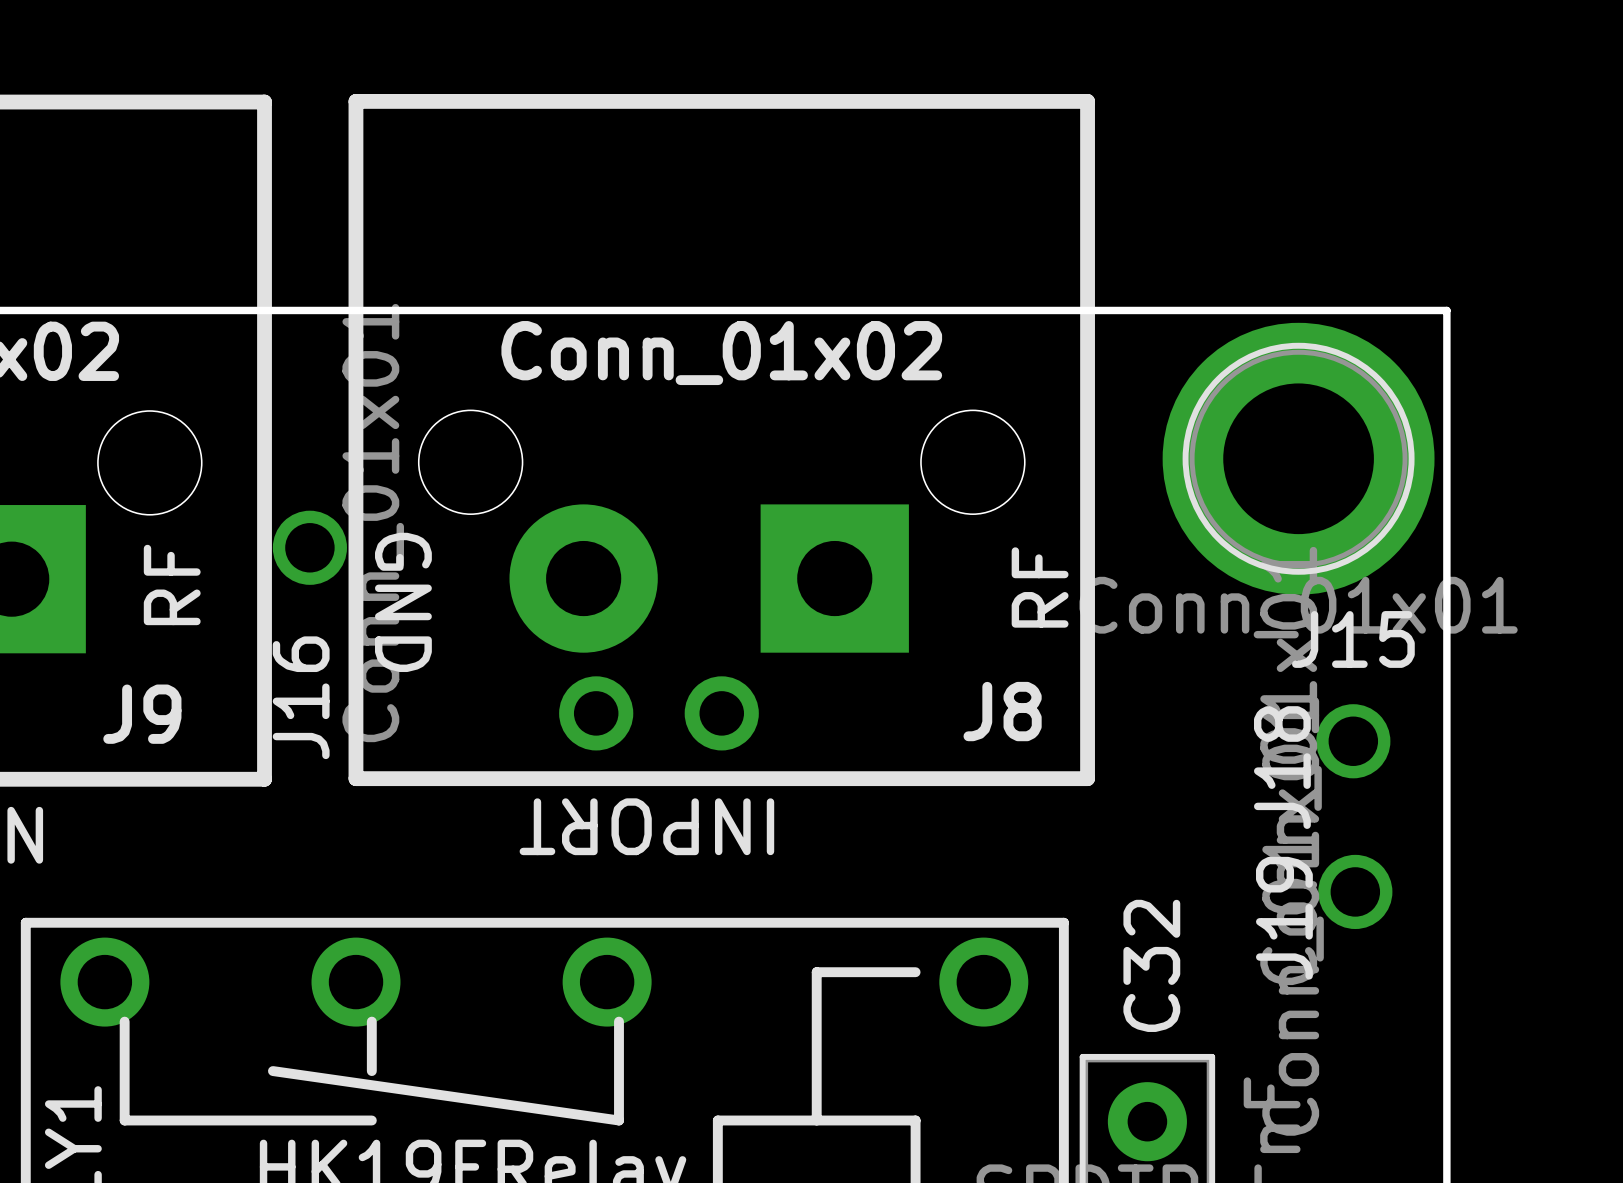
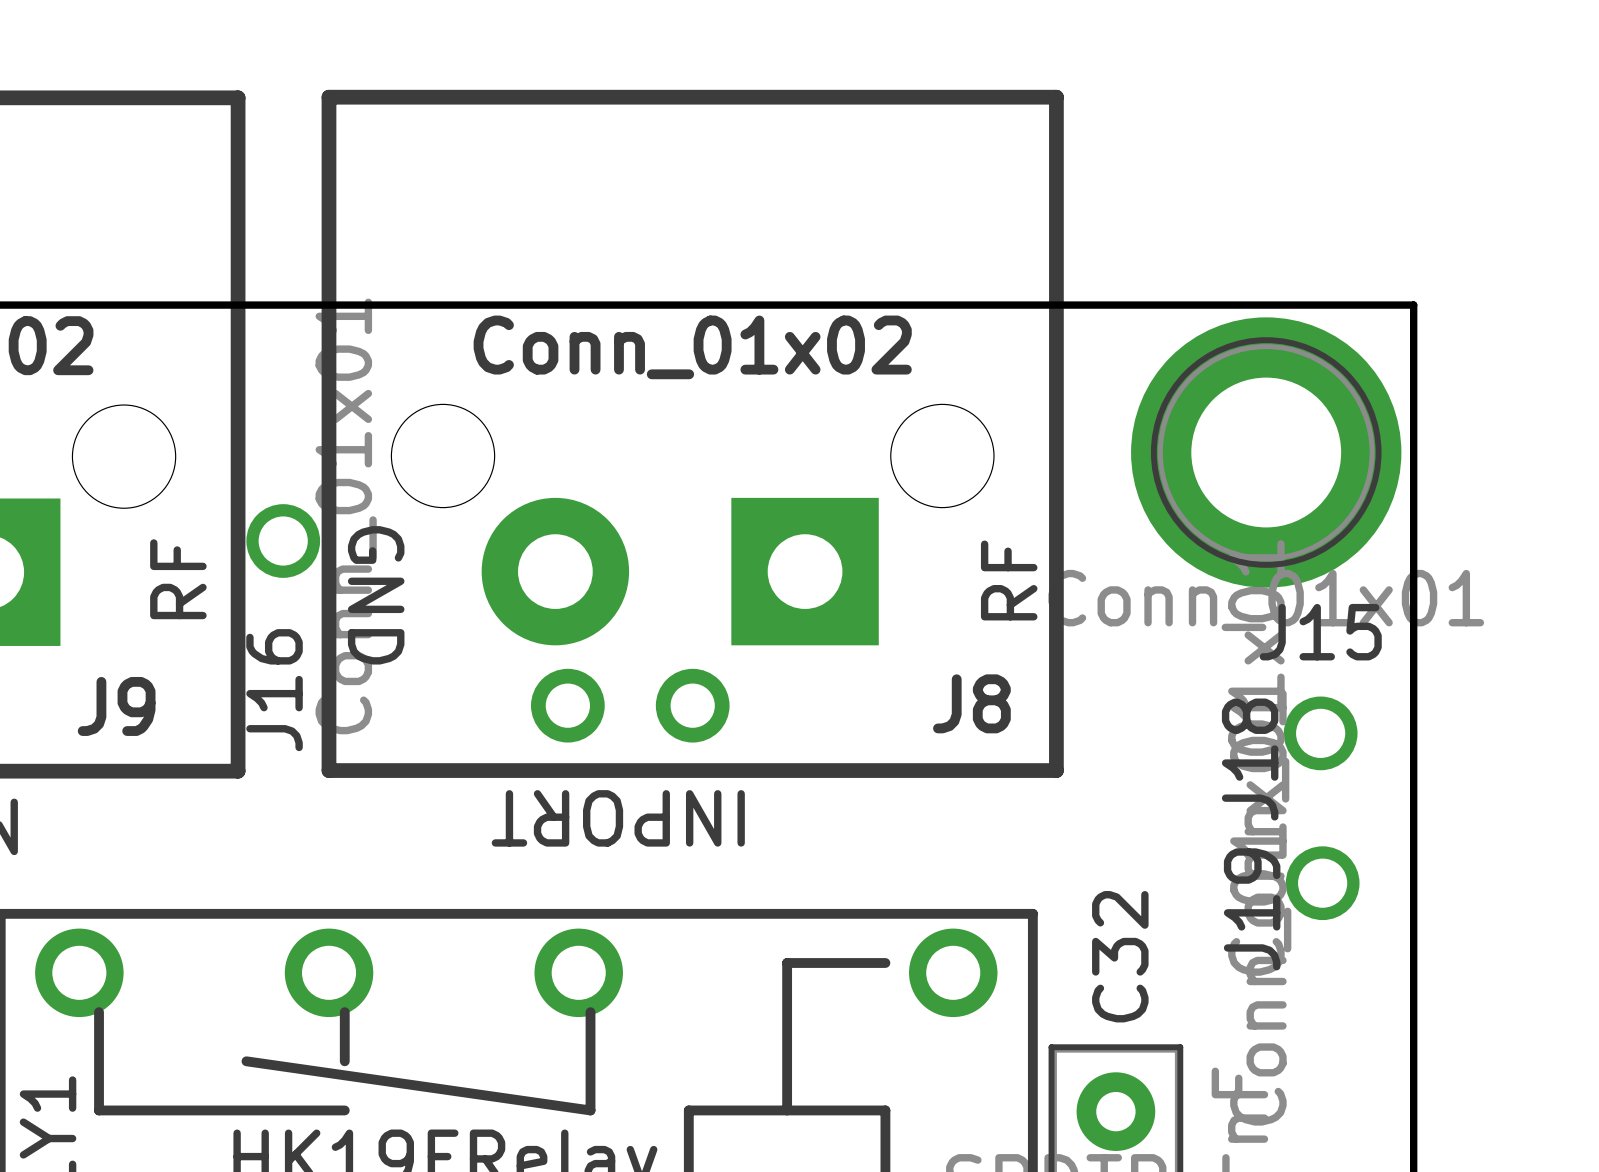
text position: RF (172, 584) -> RF (178, 579)

